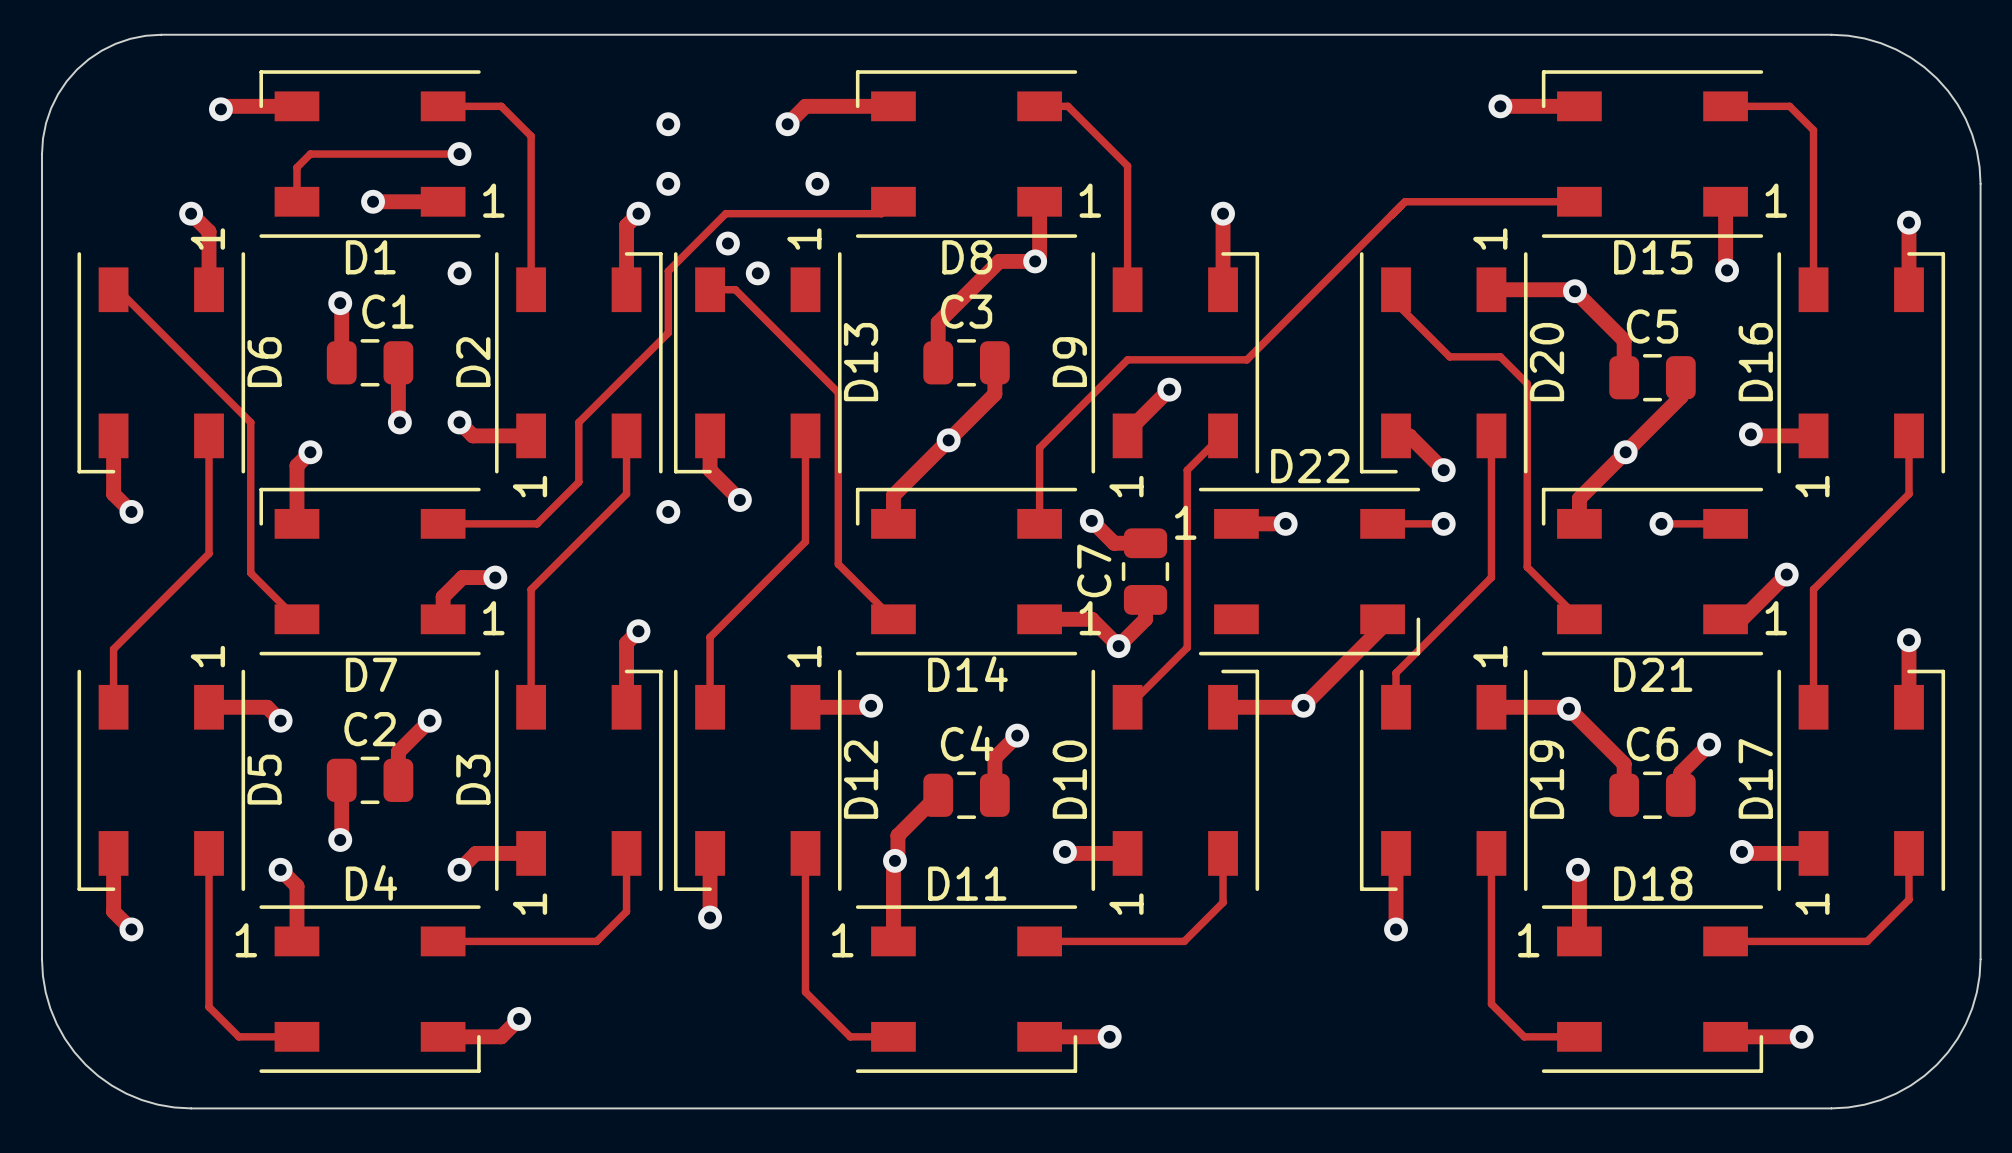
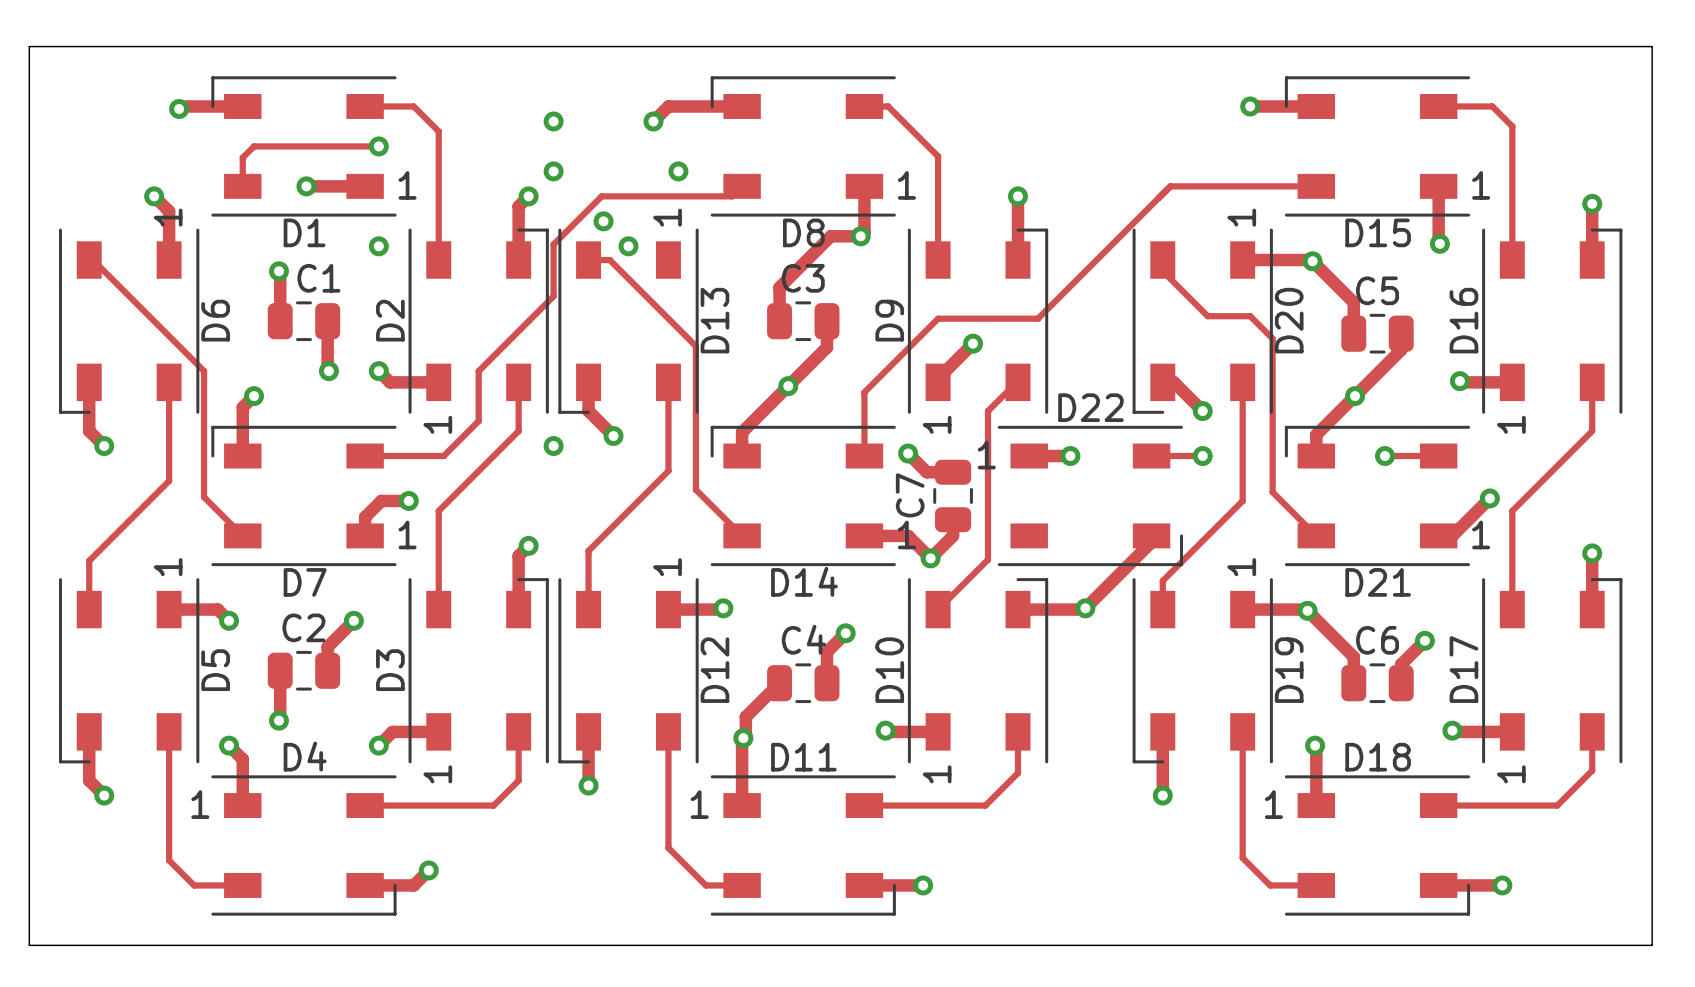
board edge: (161, 34) (130, 38) (115, 43) (88, 59) (76, 69) (66, 81) (51, 108) (46, 123) (42, 154) -> (129, 46) (29, 46) (29, 146)
board edge: (1831, 34) (1848, 35) (1880, 43) (1910, 57) (1936, 78) (1957, 104) (1972, 134) (1979, 167) (1980, 183) -> (1527, 46) (1652, 46) (1652, 171)
board edge: (42, 959) (42, 975) (50, 1008) (64, 1038) (85, 1064) (111, 1085) (141, 1100) (174, 1107) (191, 1108) -> (29, 820) (29, 945) (154, 945)
board edge: (1980, 959) (1979, 975) (1972, 1008) (1957, 1038) (1936, 1064) (1910, 1085) (1880, 1100) (1848, 1107) (1831, 1108) -> (1652, 820) (1652, 945) (1527, 945)

